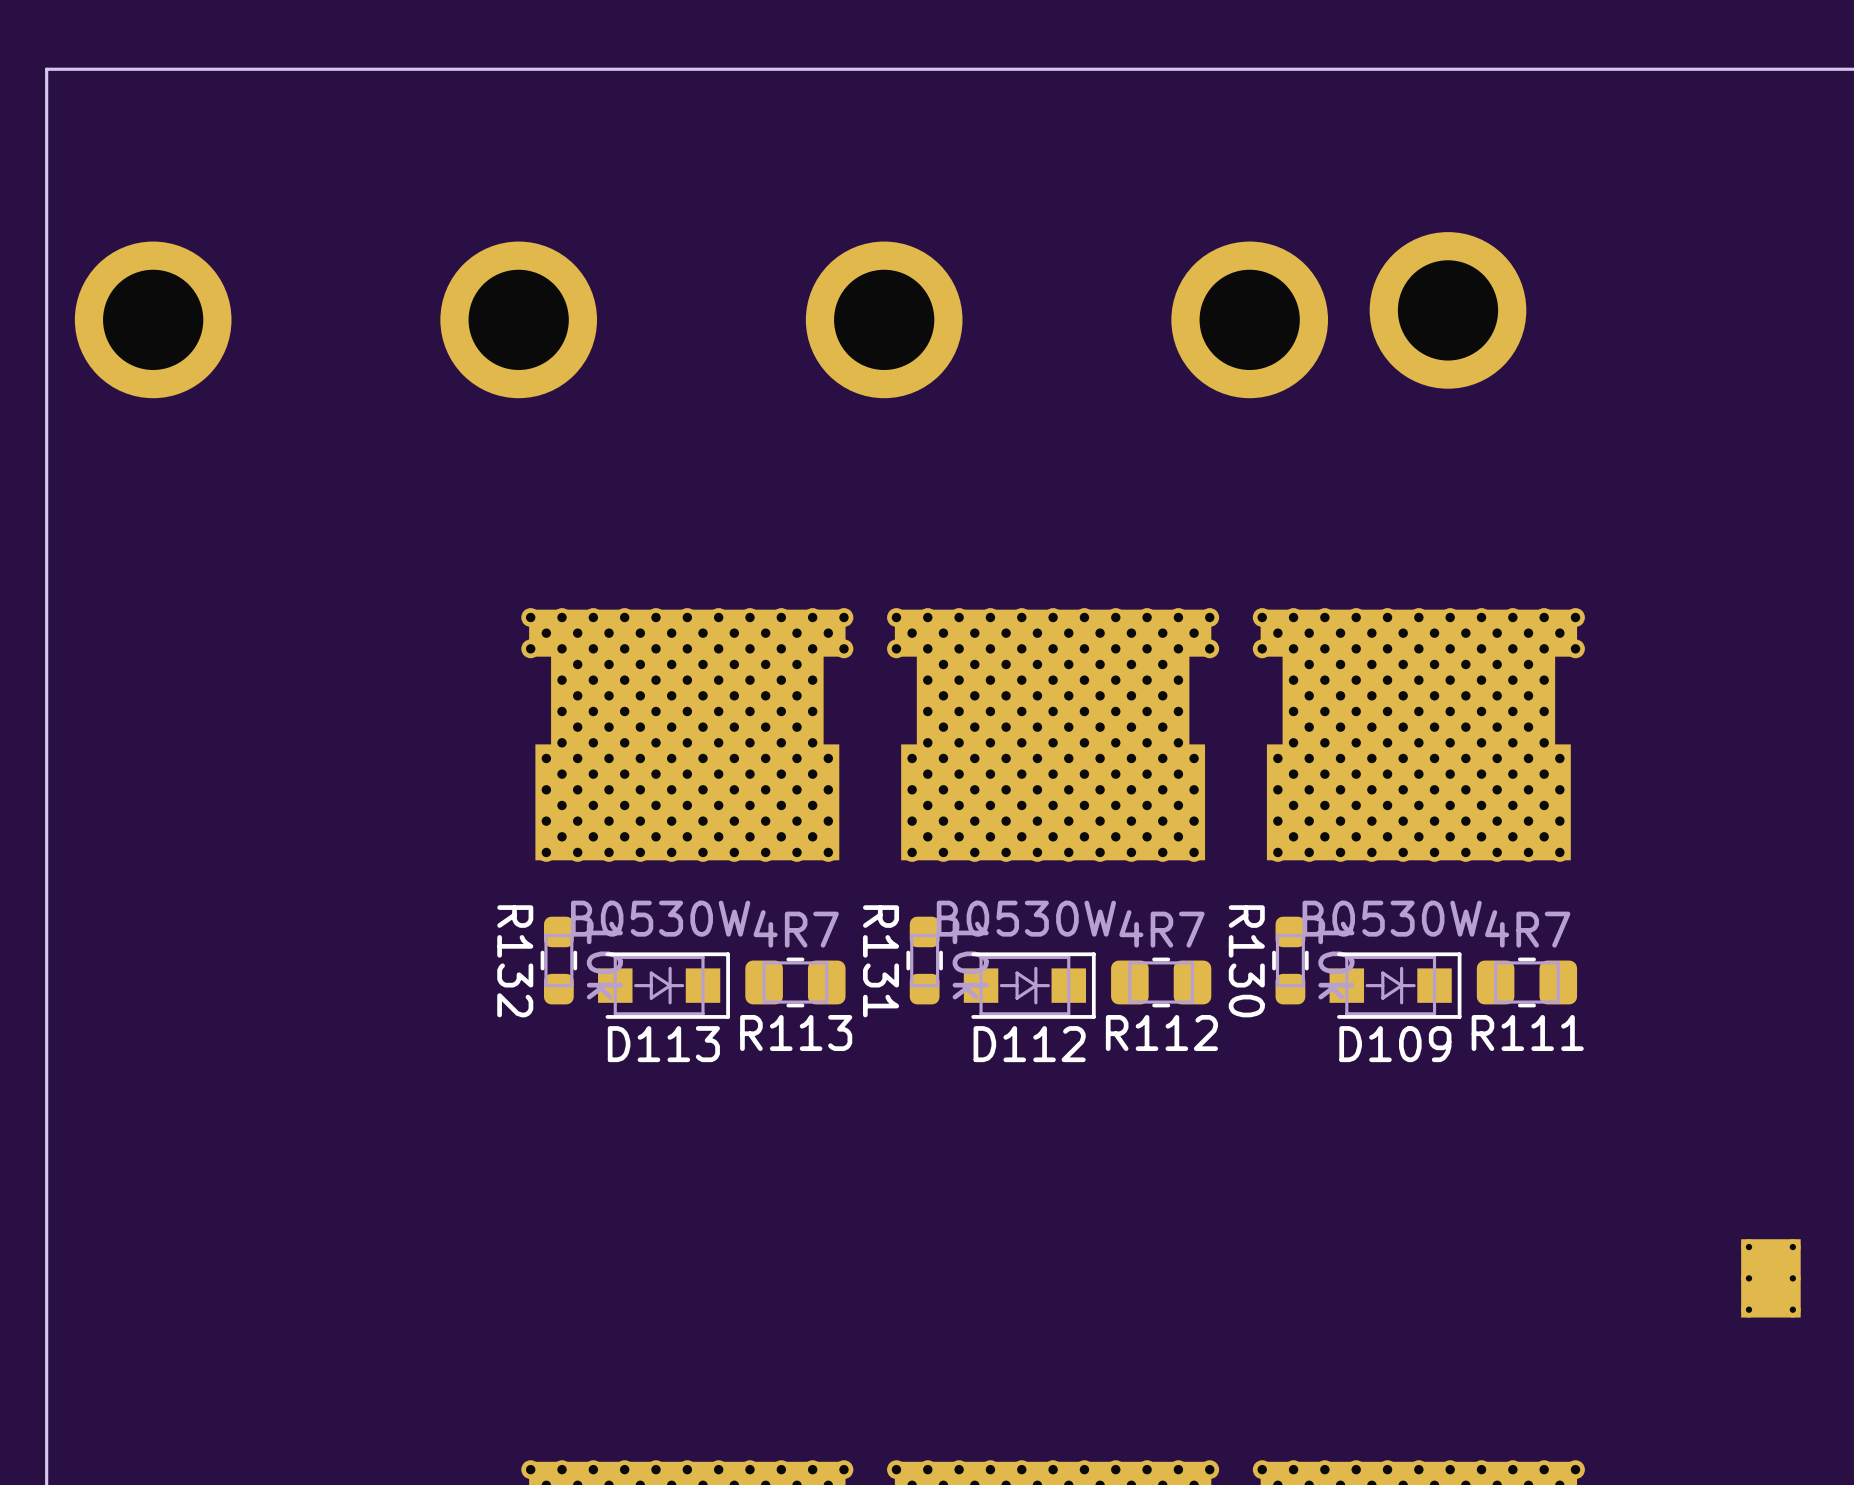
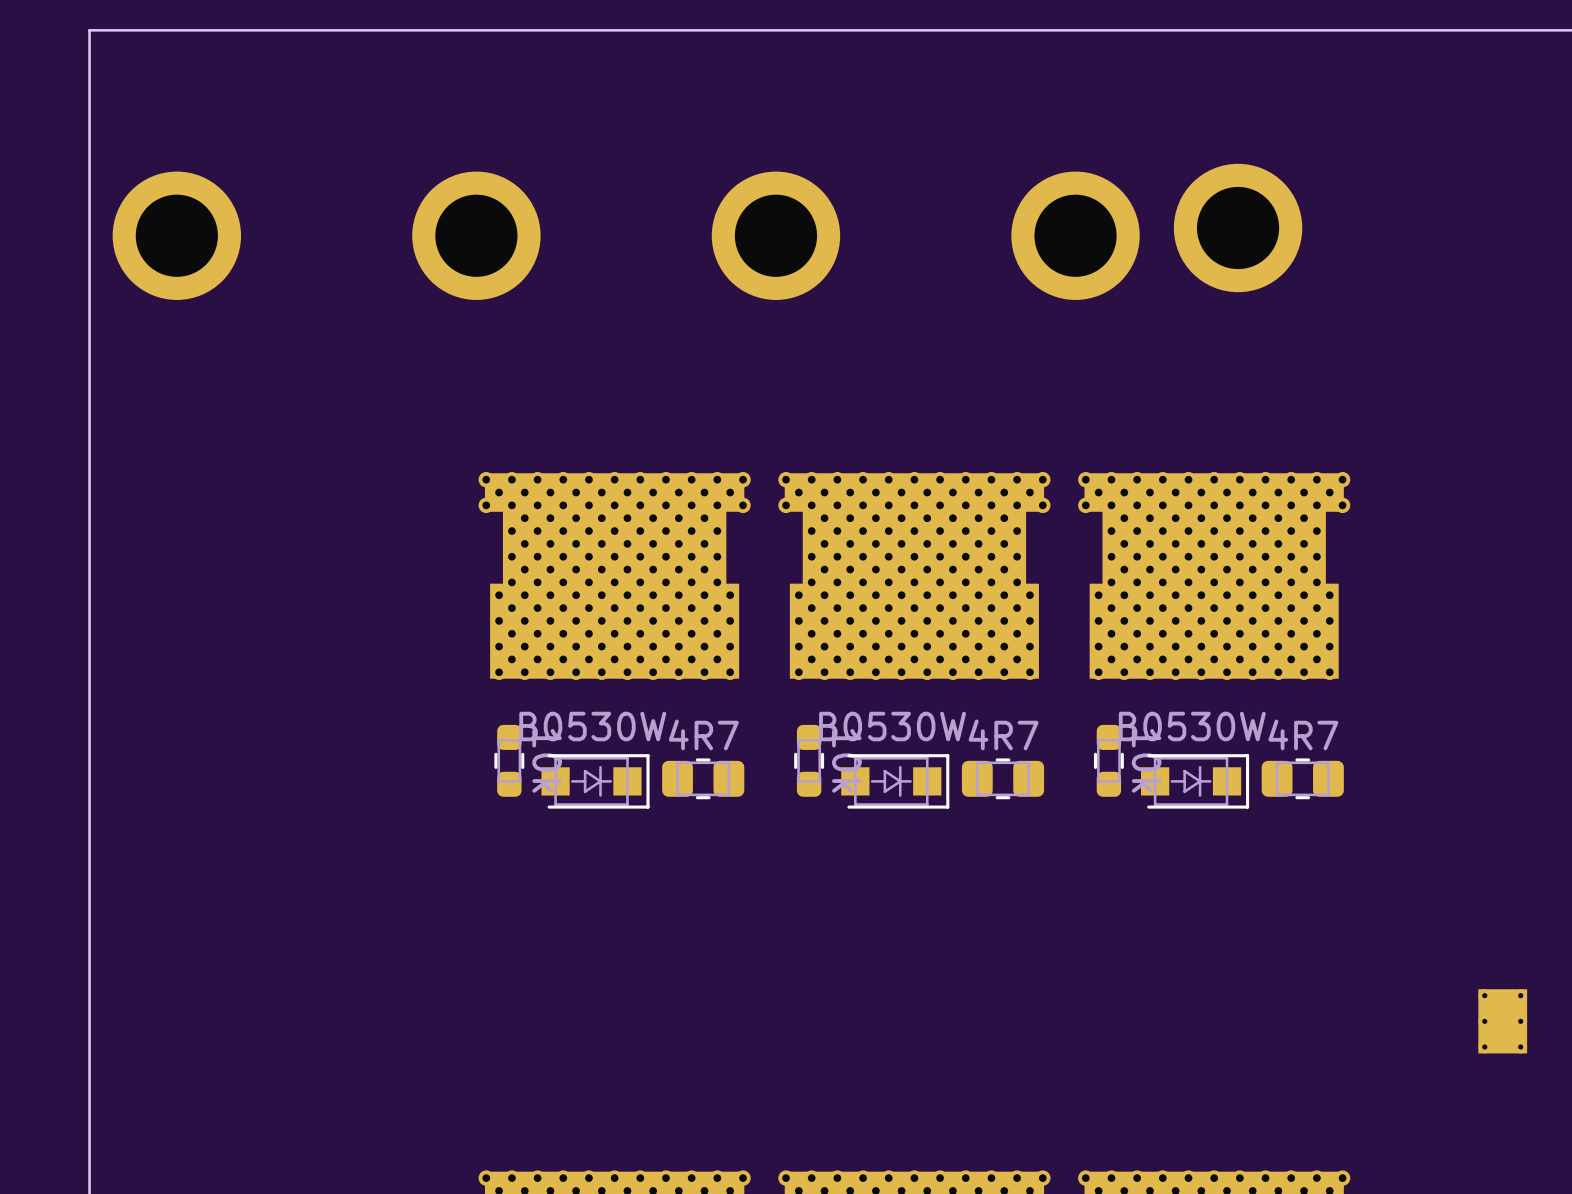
R132 name: R132 (515, 961) -> none
R131 name: R131 (881, 961) -> none
R130 name: R130 (1246, 961) -> none
R113 name: R113 (796, 1033) -> none
R112 name: R112 (1161, 1033) -> none
R111 name: R111 (1527, 1033) -> none
D113 name: D113 (663, 1044) -> none
D112 name: D112 (1029, 1044) -> none
D109 name: D109 (1395, 1044) -> none

